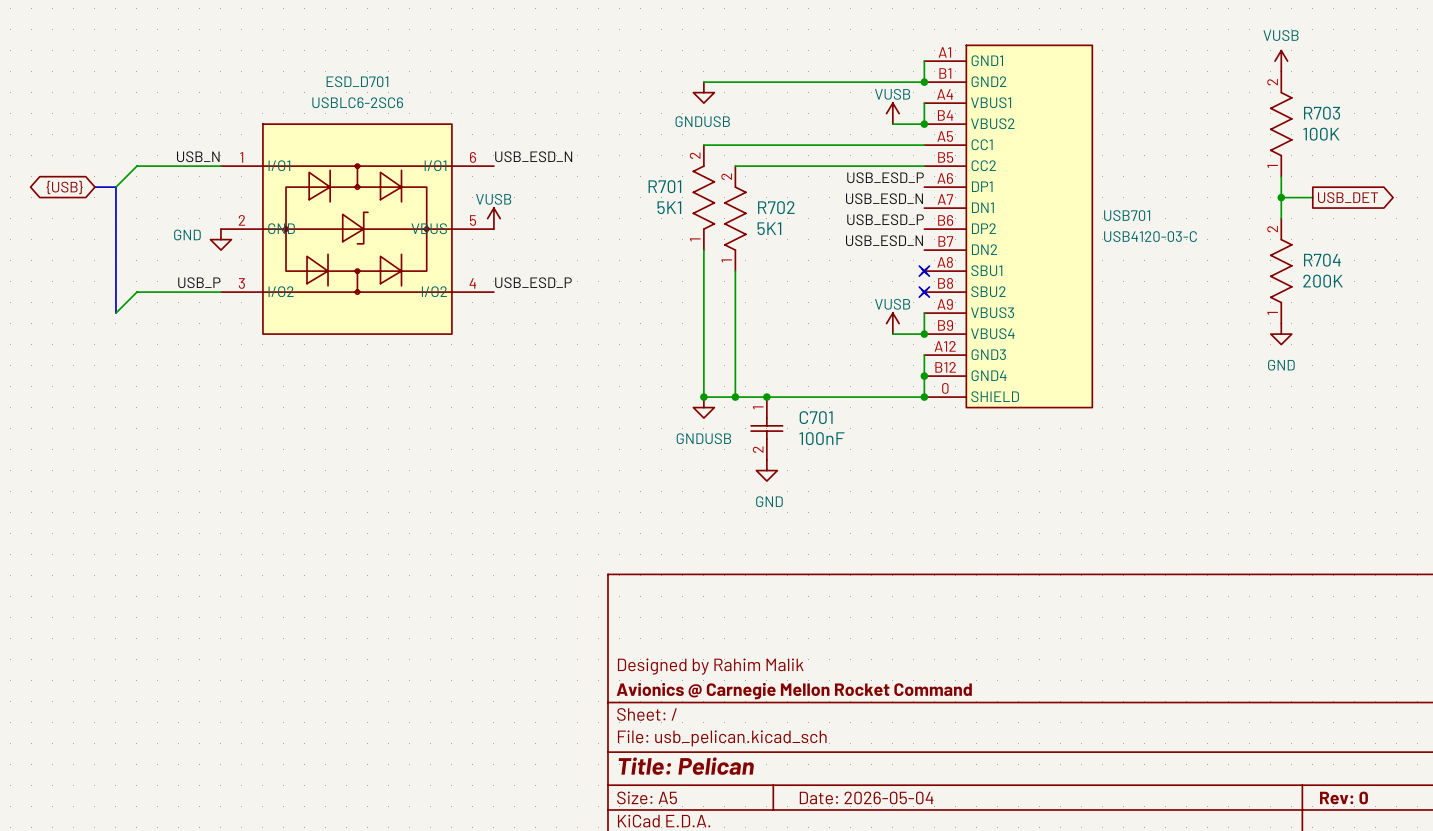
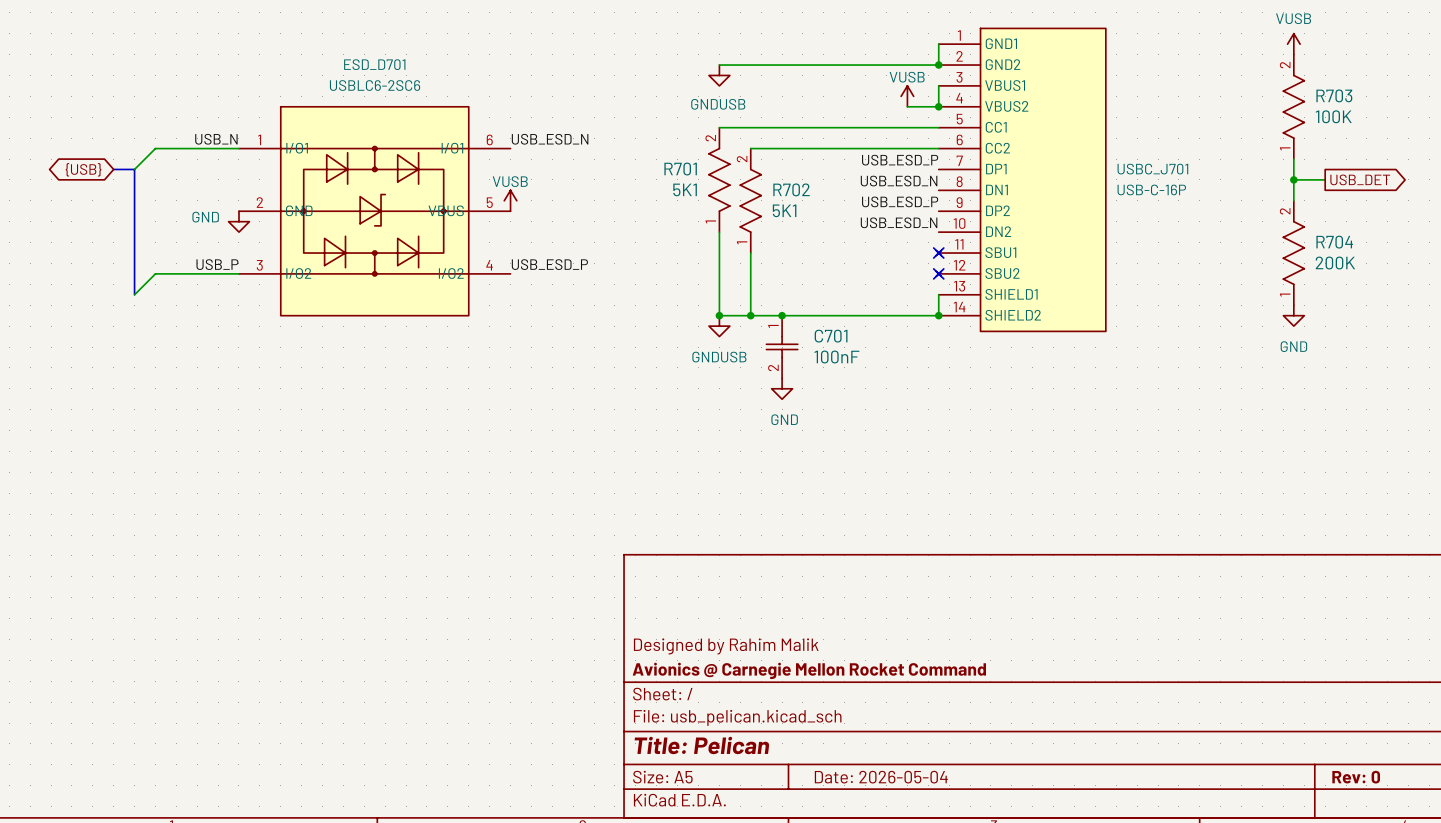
USBC_J701: none -> USB-C-16P (1021, 179)
USB701: USB4120-03-C (1007, 226) -> none
power symbol: VUSB (892, 323) -> none
wire: (703, 334) (703, 397) (924, 397) (924, 355) -> (719, 315) (907, 315)
junction: none -> (719, 315)
wire: (735, 334) (735, 397) -> none
junction: none -> (750, 315)
junction: none -> (782, 315)
junction: (924, 376) -> none
junction: (703, 397) -> none
junction: (735, 397) -> none
junction: (766, 397) -> none
junction: (924, 397) -> none
power symbol position: GNDUSB (703, 407) -> GNDUSB (719, 326)
C701 position: (766, 428) -> (782, 347)
power symbol position: GND (766, 470) -> GND (782, 388)

